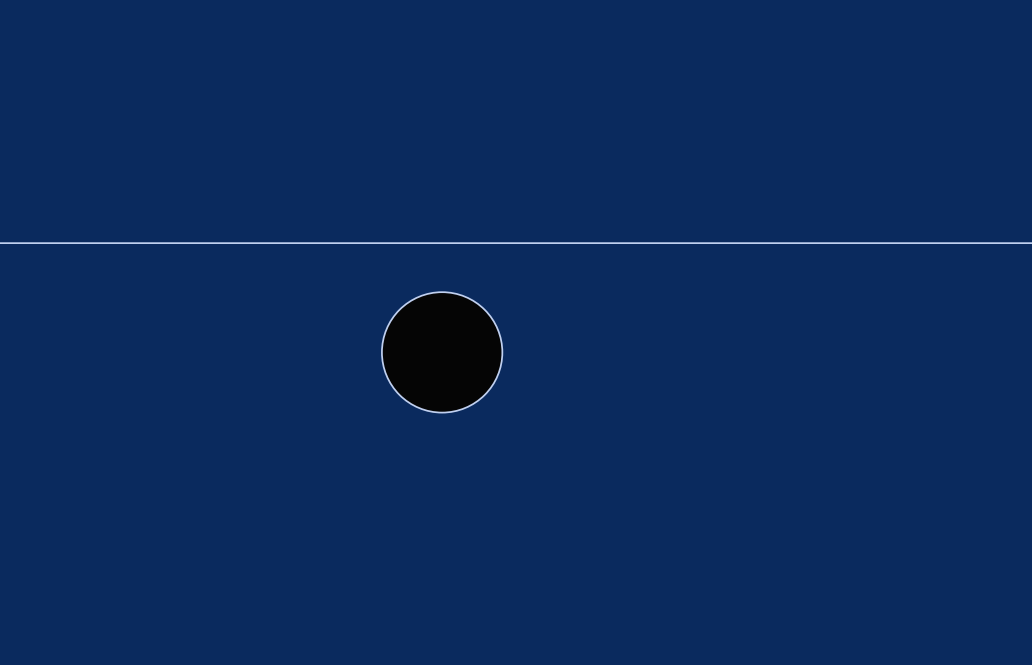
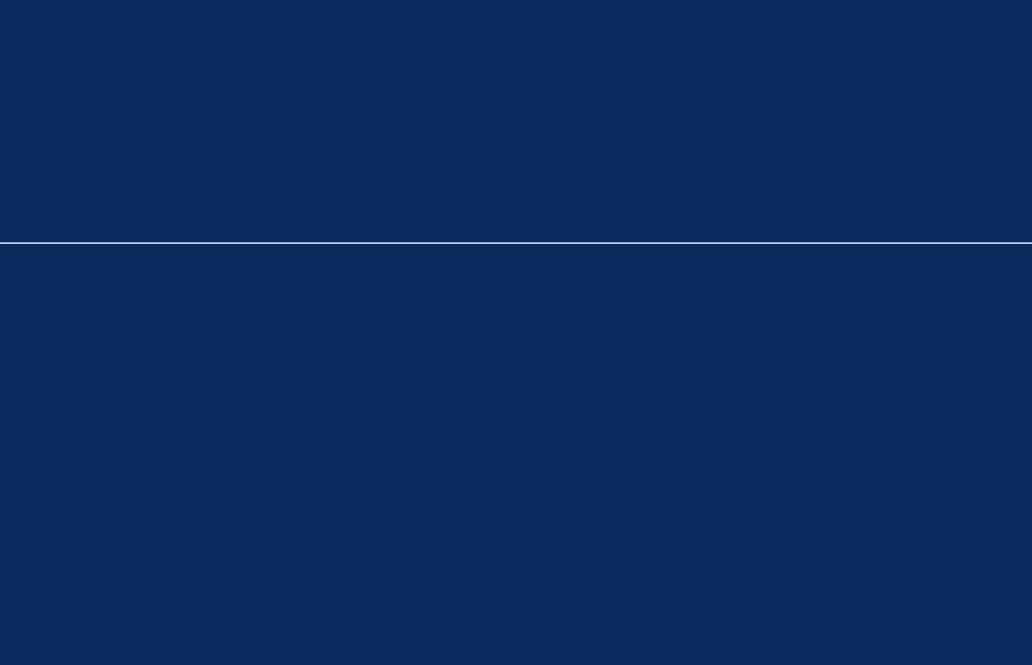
hole: (442, 352) -> none

